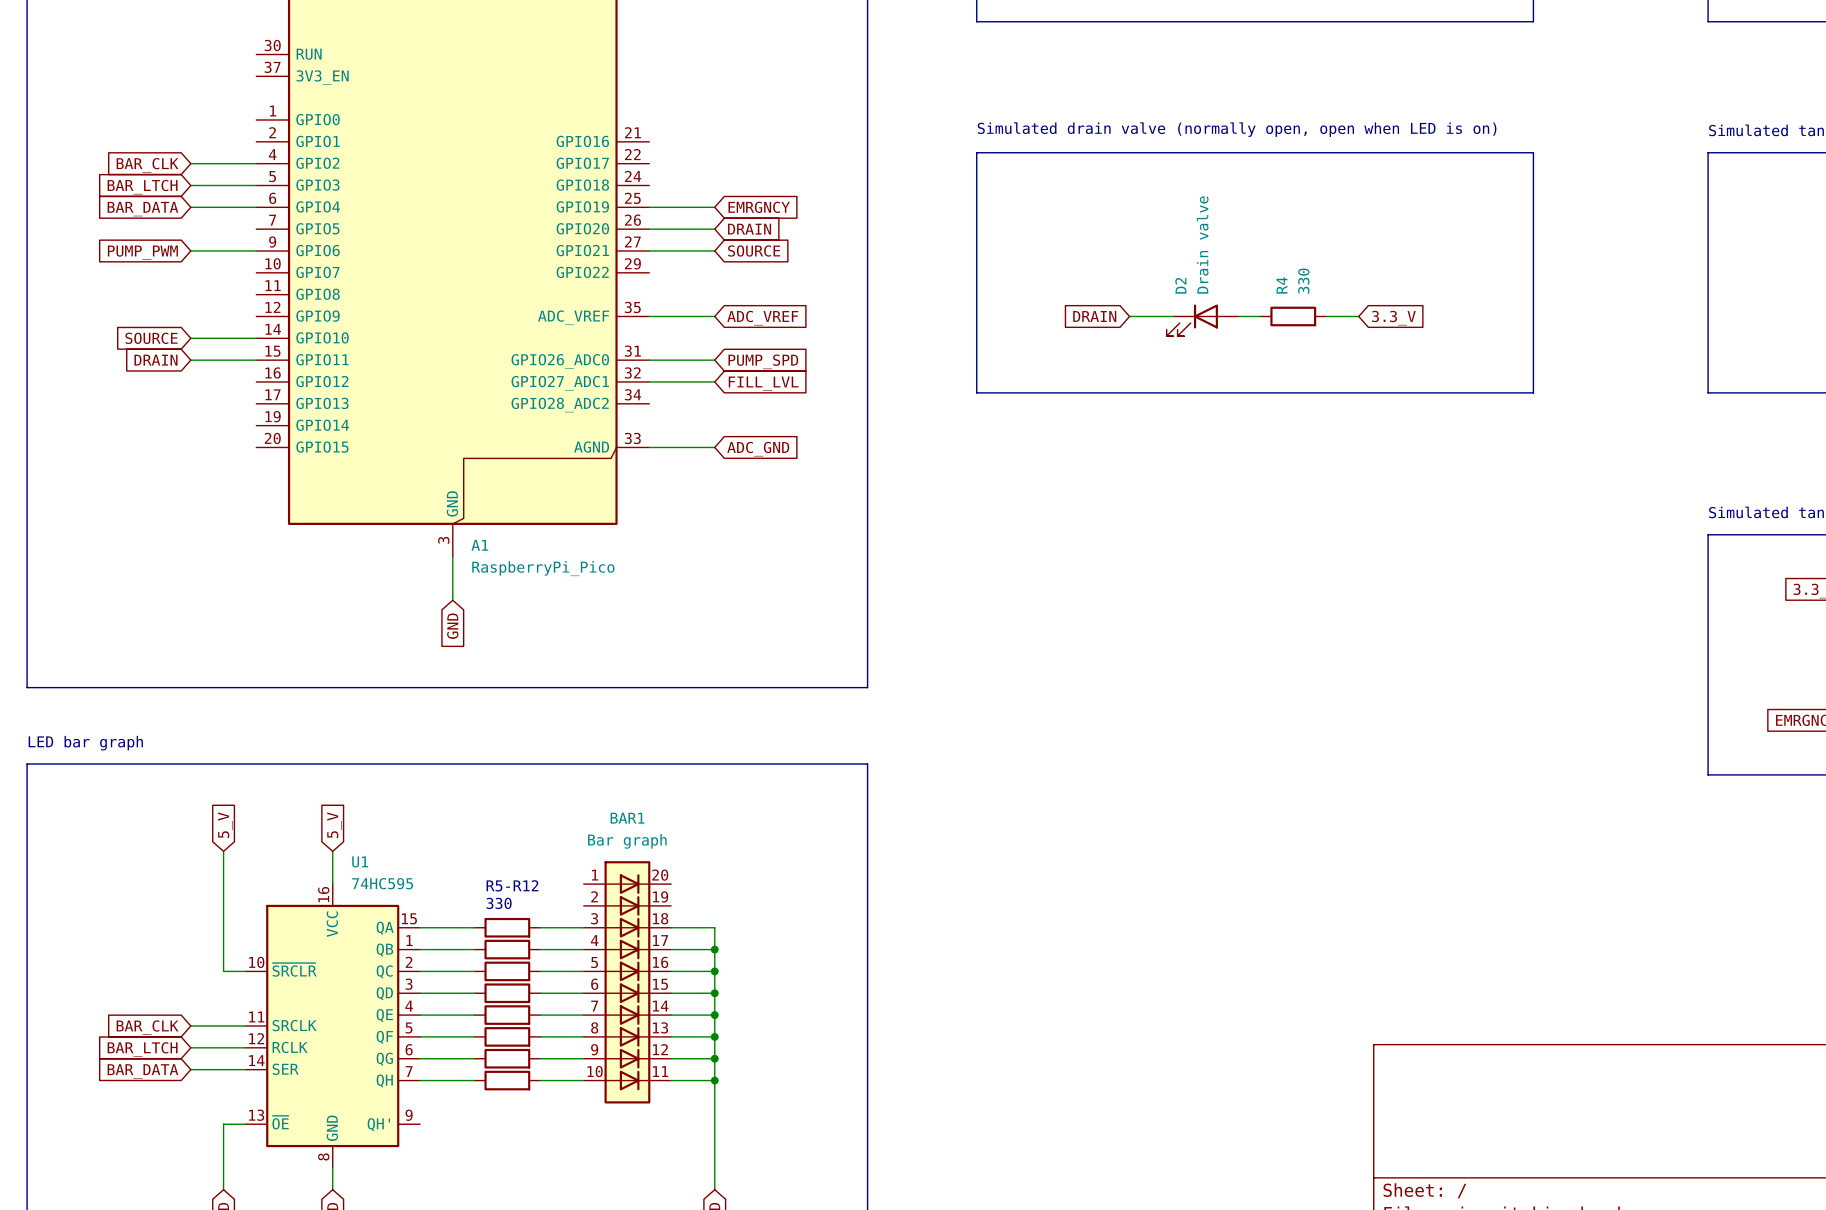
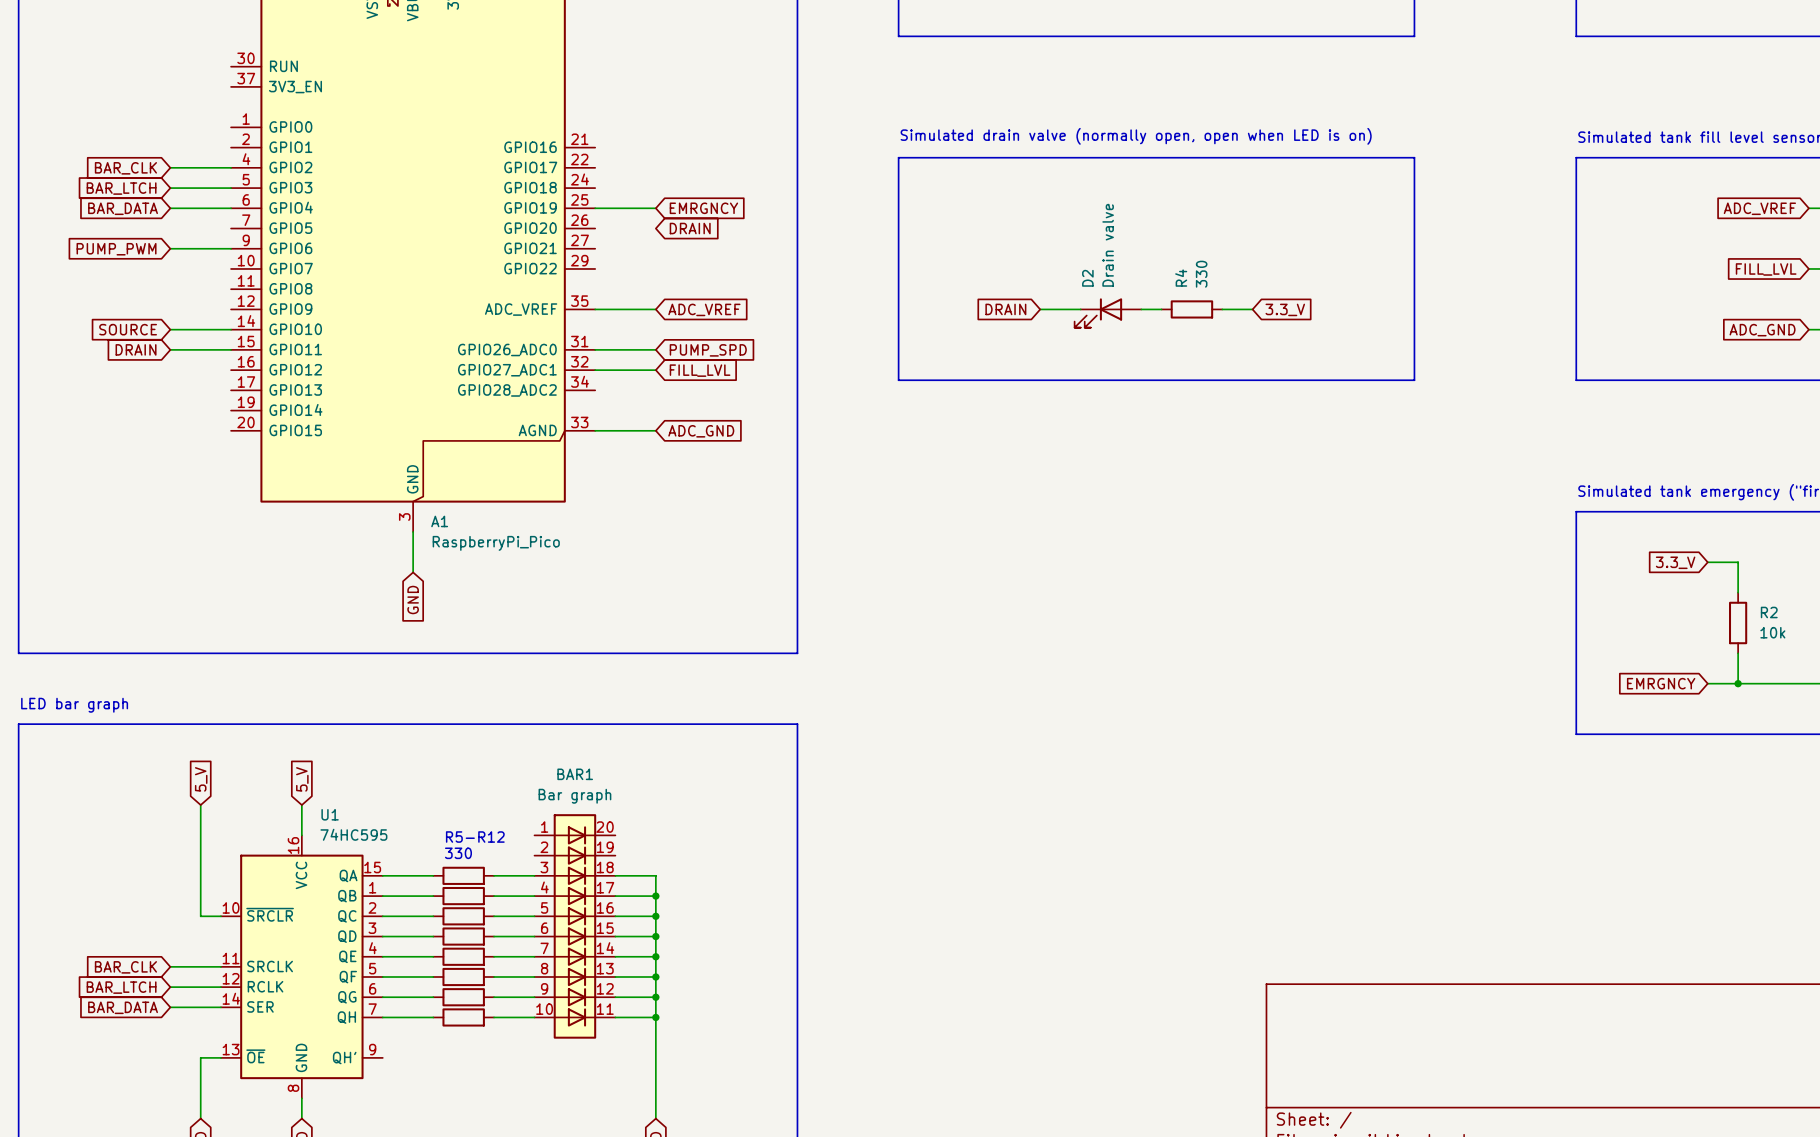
wire: (649, 229) (714, 229) -> none
wire: (649, 250) (714, 250) -> none
global label: SOURCE (754, 250) -> none

